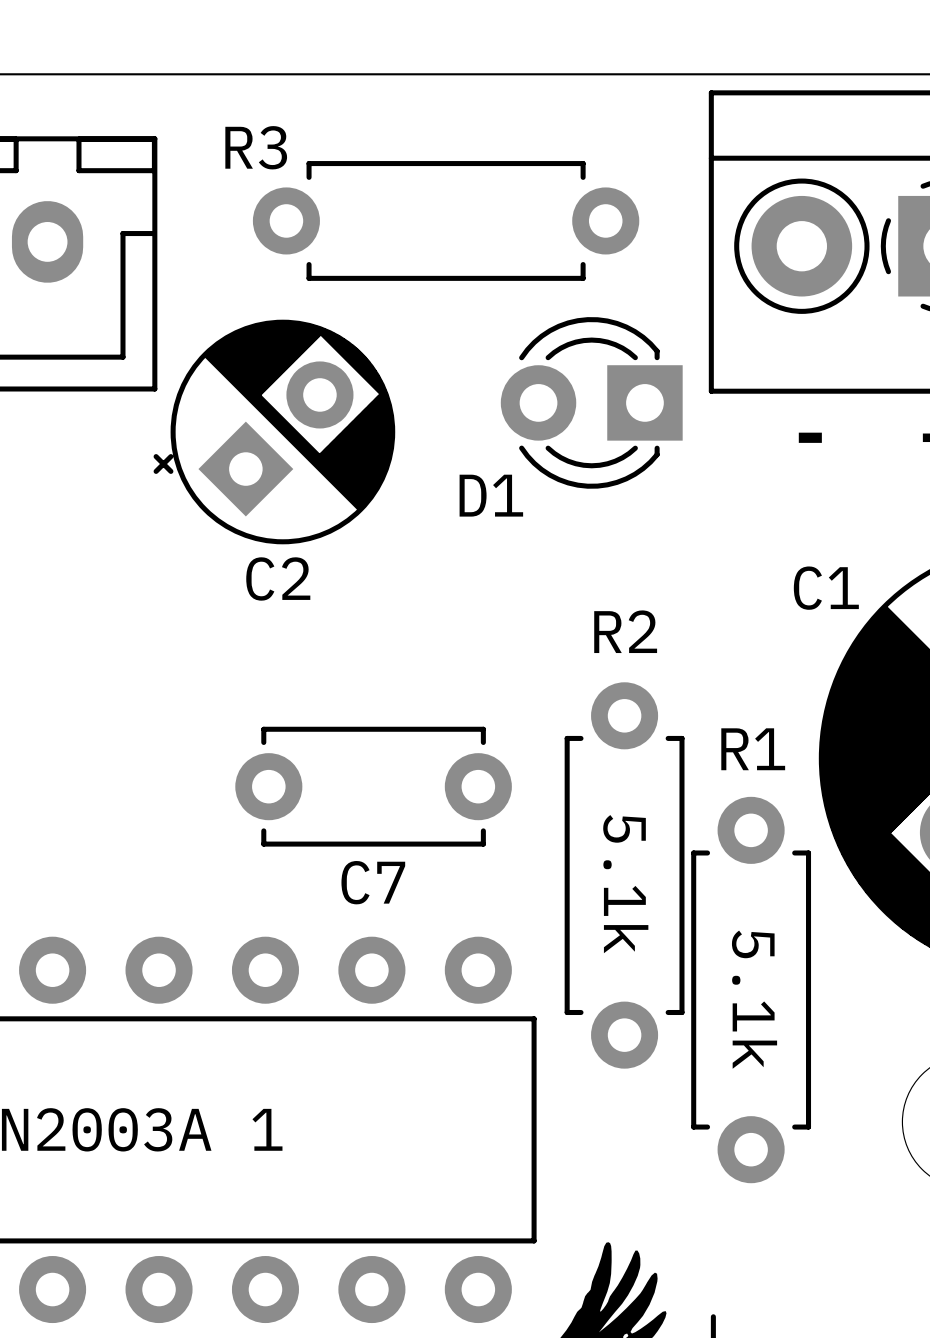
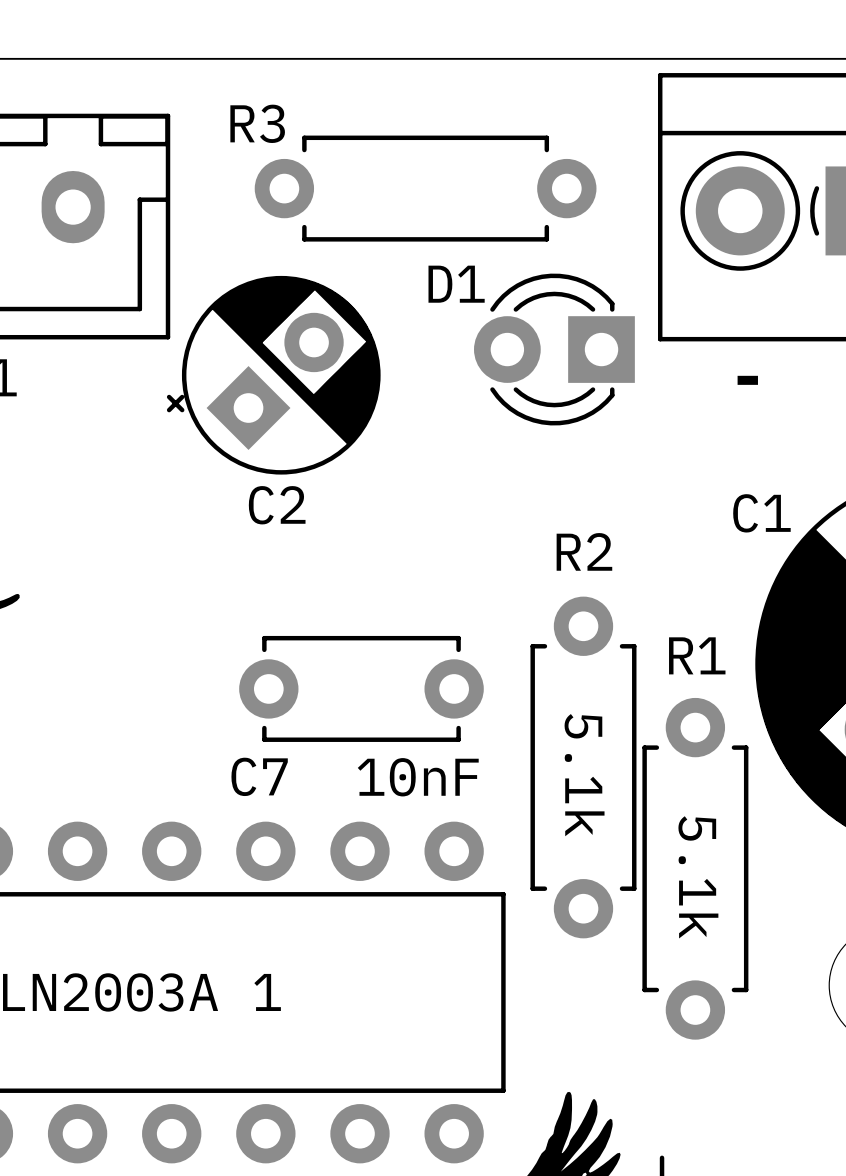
D1 name position: D1 (491, 495) -> D1 (456, 284)
C7 name position: C7 (373, 882) -> C7 (259, 776)
text: none -> 10nF (418, 777)

